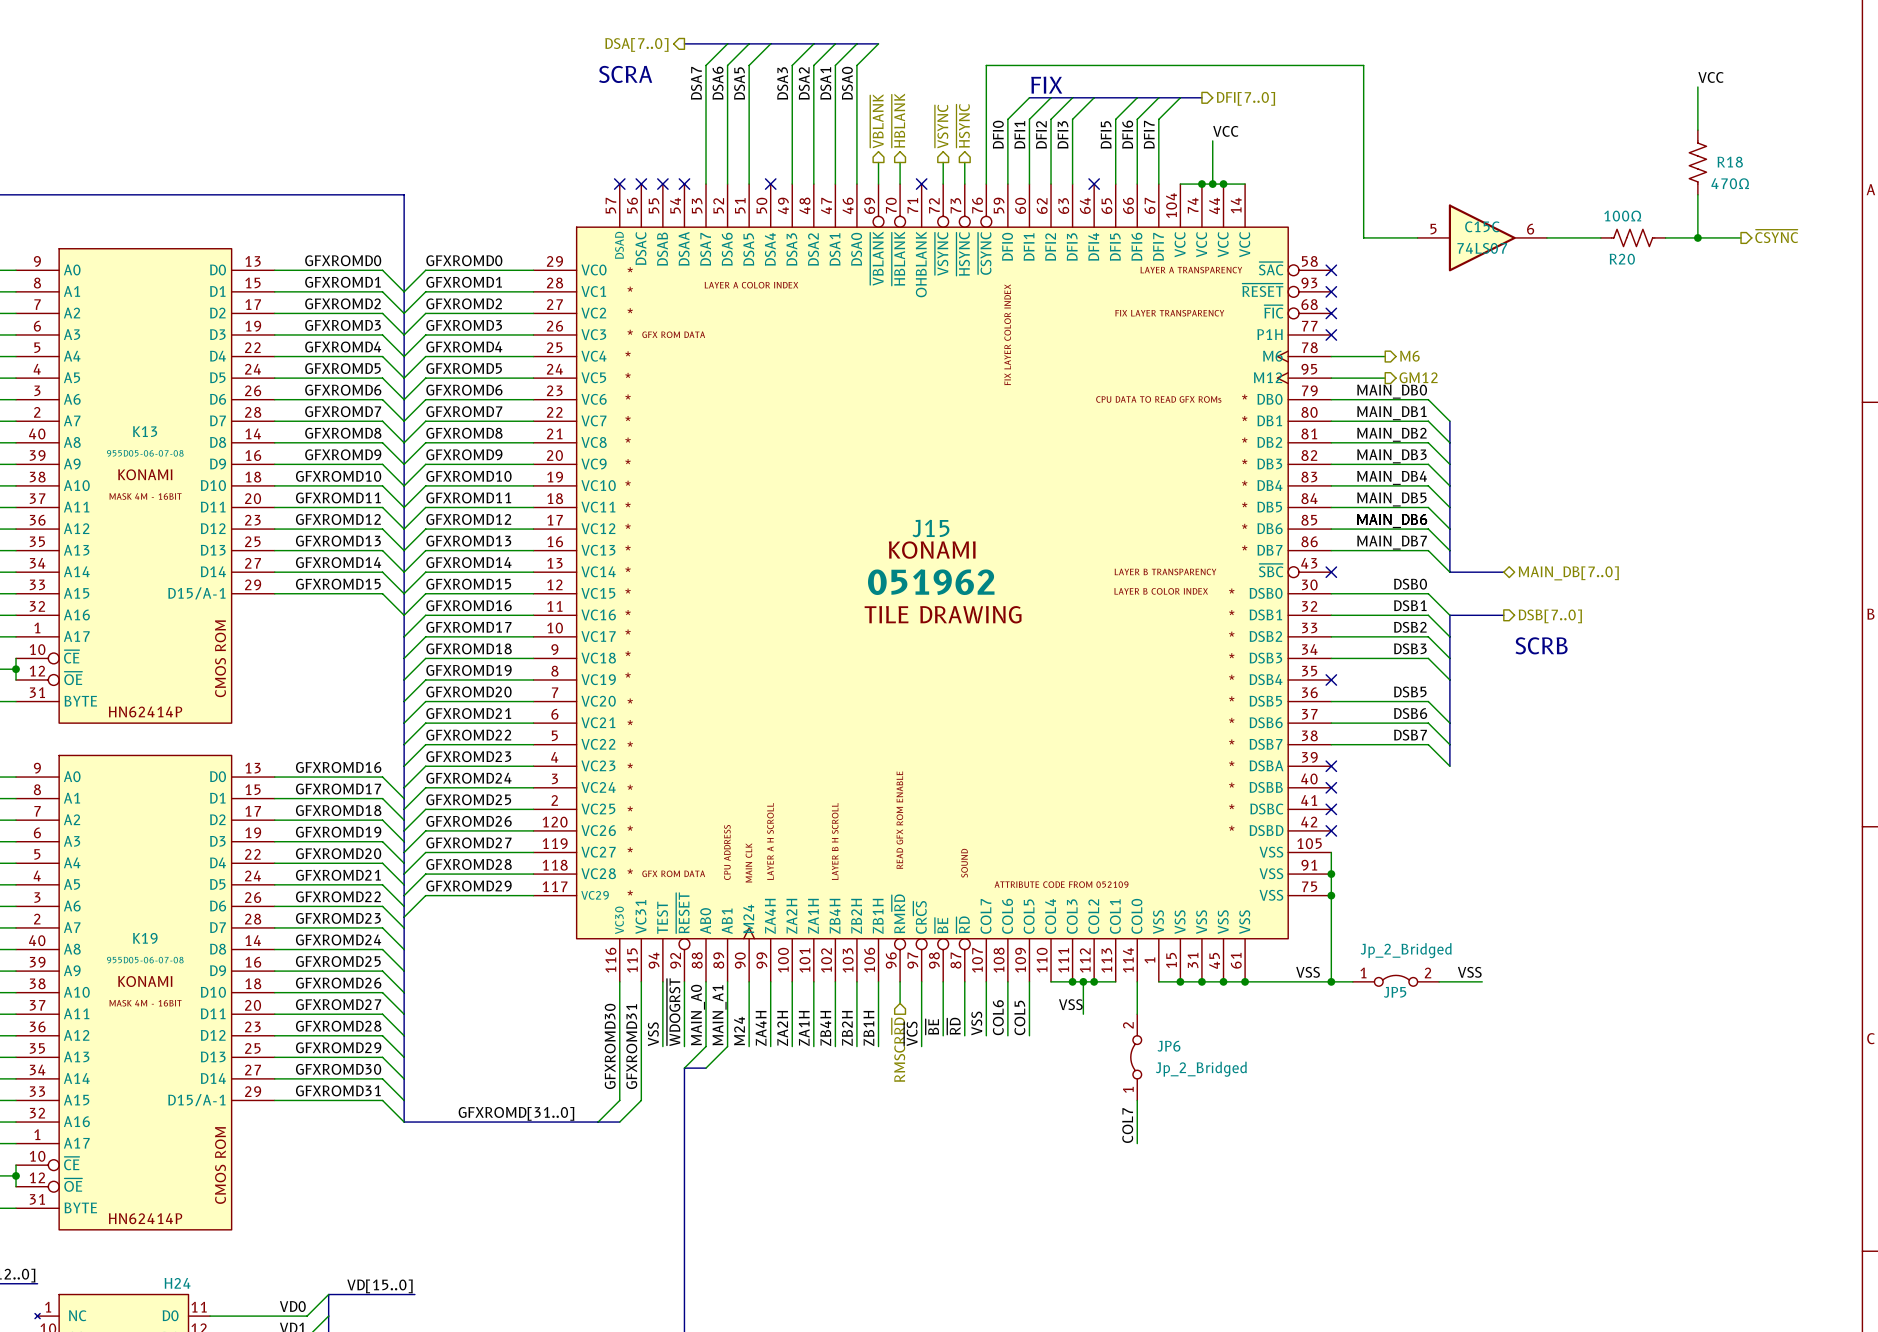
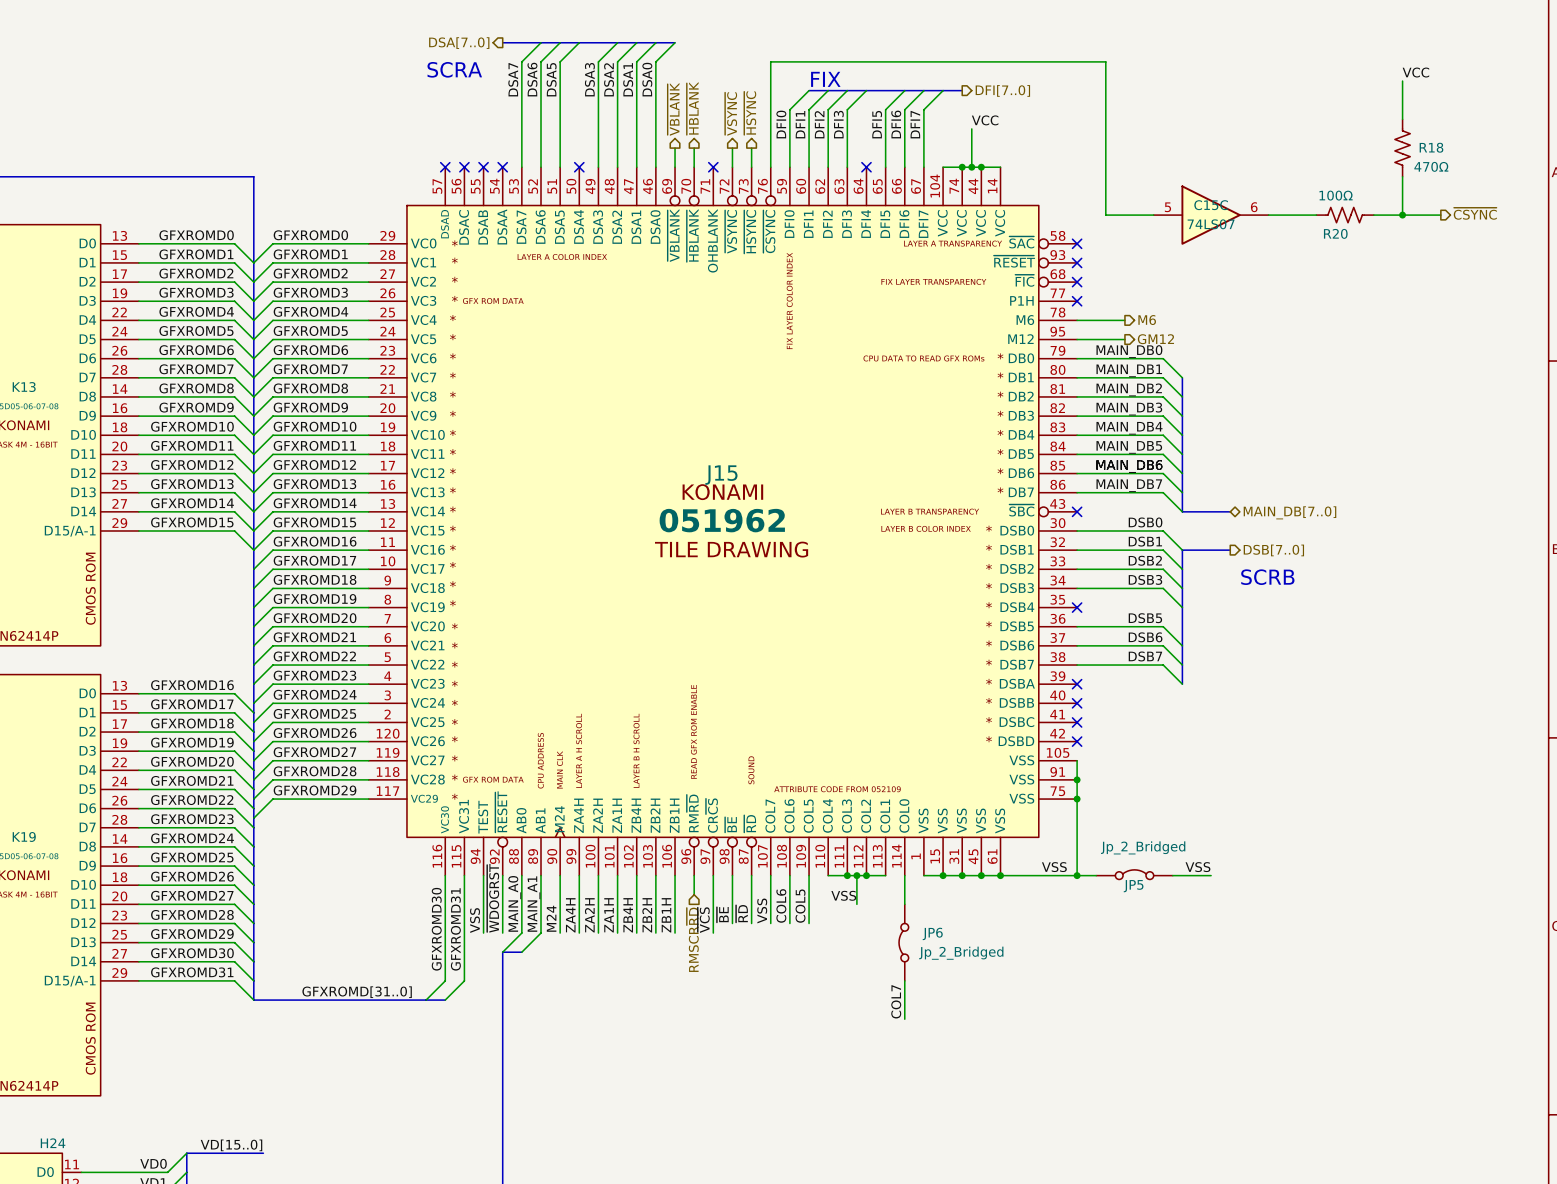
J15 symbol: [533, 184, 1332, 982] -> [368, 167, 1078, 876]
JP5 pin number: 1 (1363, 972) -> none
JP5 pin number: 2 (1428, 972) -> none
JP6 pin number: 2 (1128, 1025) -> none
JP6 pin number: 1 (1128, 1089) -> none

